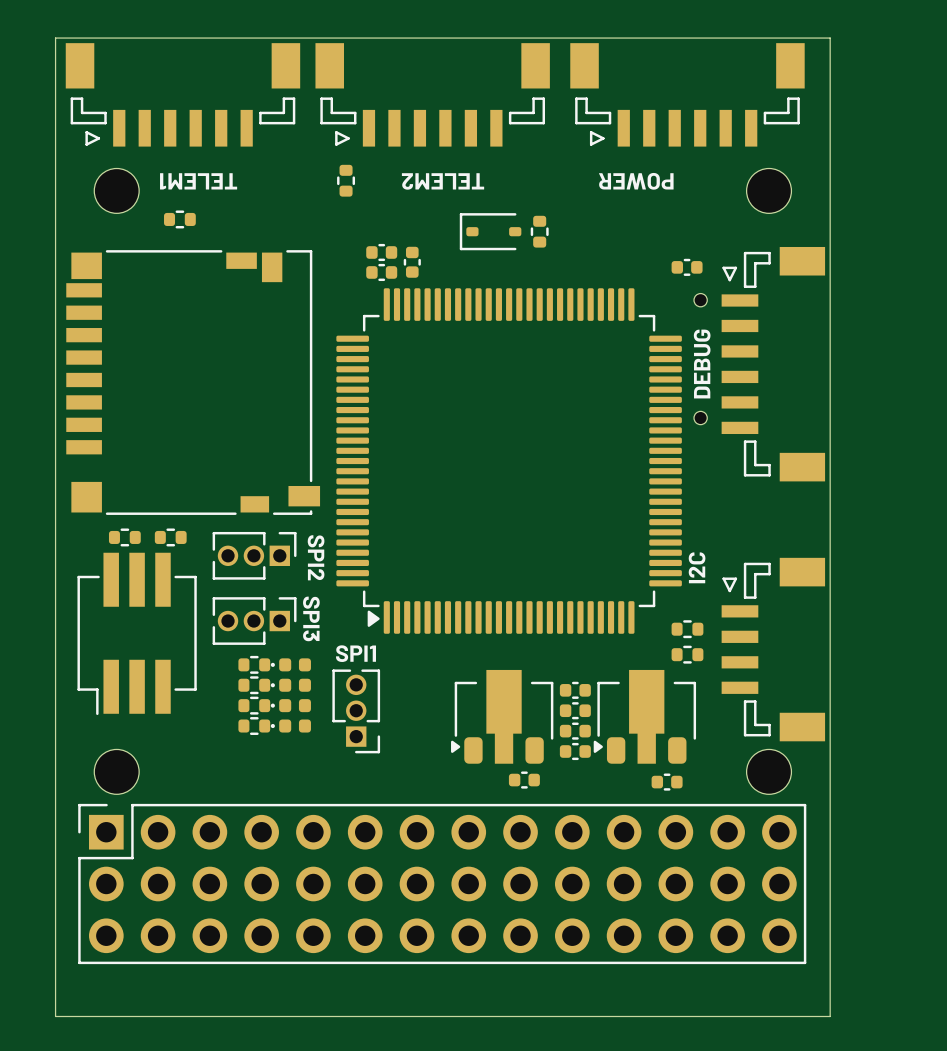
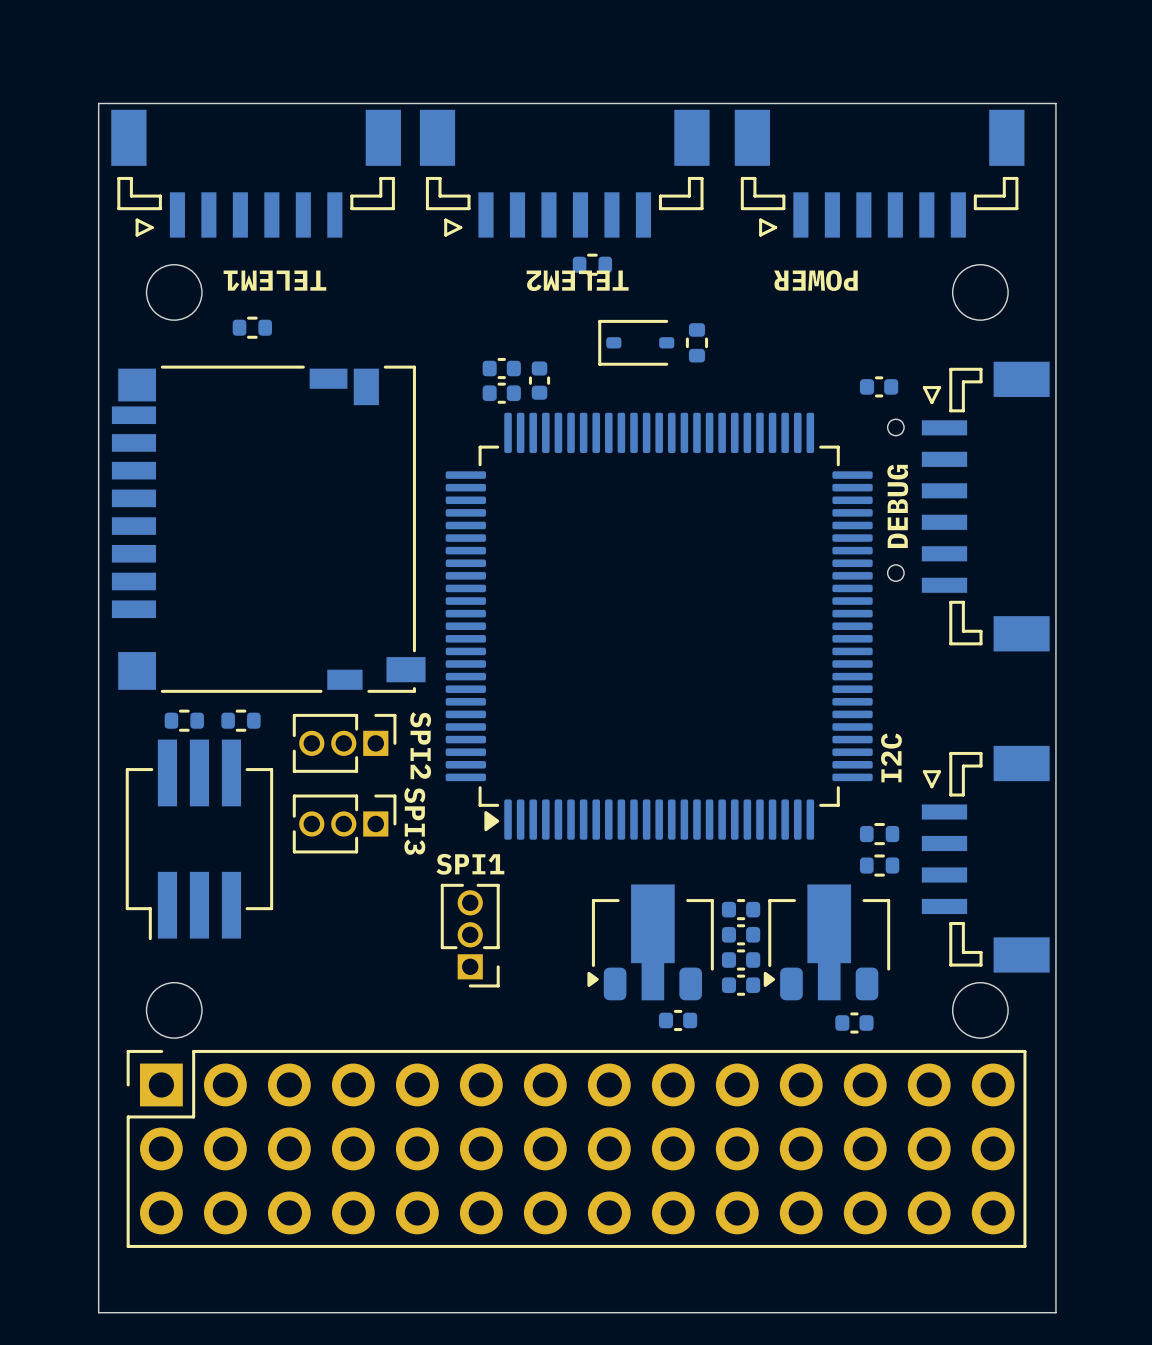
part rotation: 0° (346, 180) -> 90° clockwise (592, 264)
part position: (346, 180) -> (592, 264)
part: (254, 664) -> none
part: (290, 664) -> none
part: (254, 685) -> none
part: (290, 685) -> none
part: (254, 705) -> none
part: (290, 705) -> none
part: (254, 726) -> none
part: (290, 726) -> none

